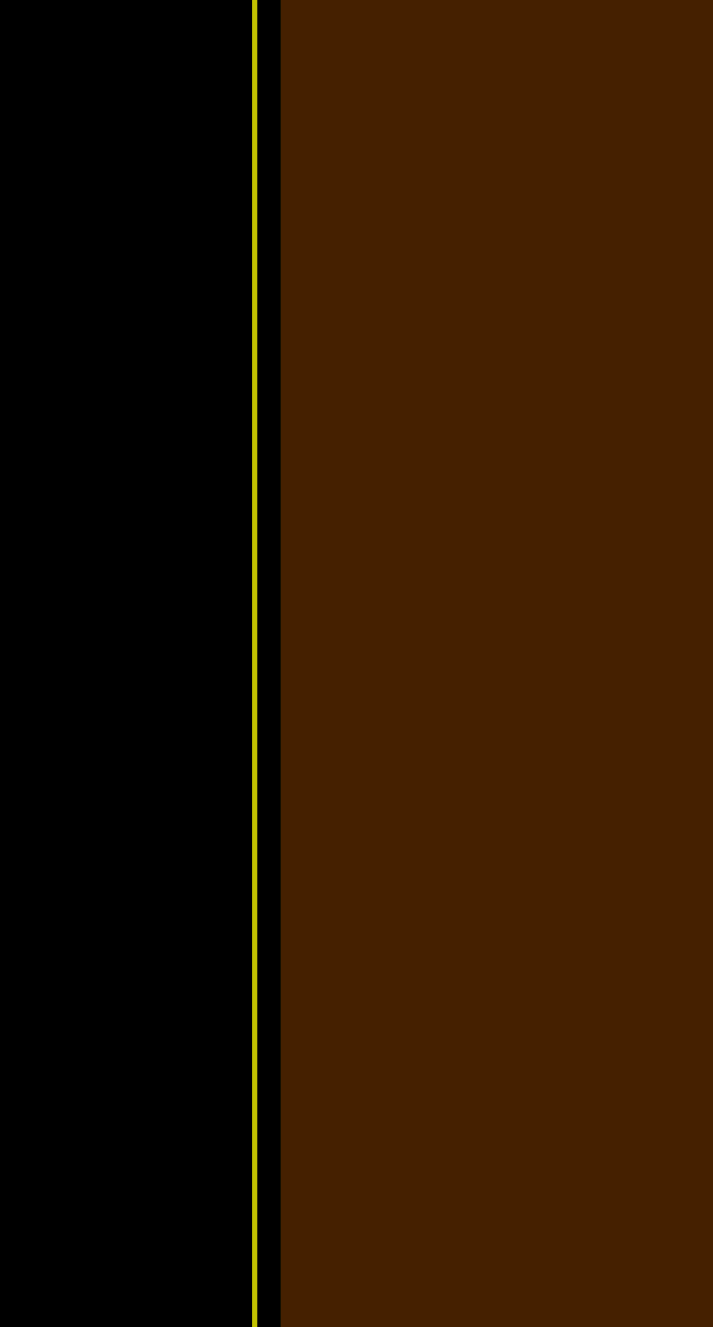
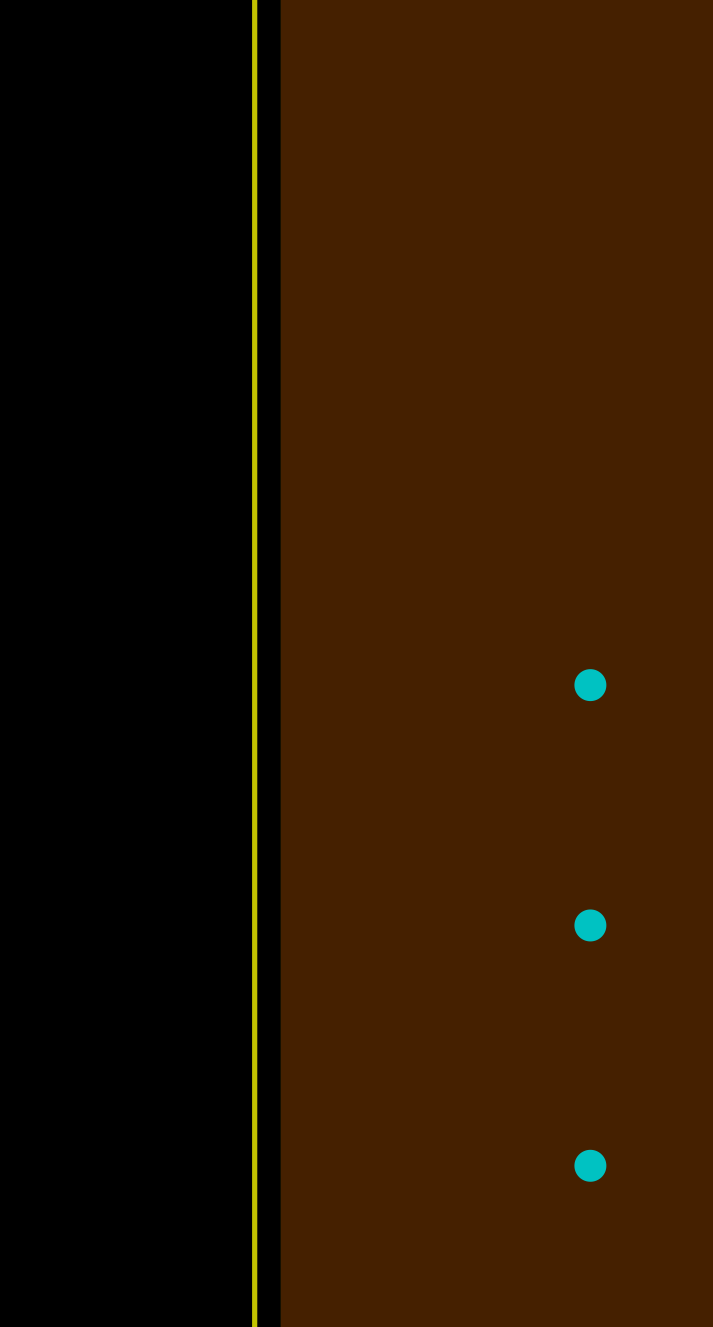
drawing: none -> [574, 669, 607, 702]
drawing: none -> [574, 909, 607, 942]
drawing: none -> [574, 1149, 607, 1182]

